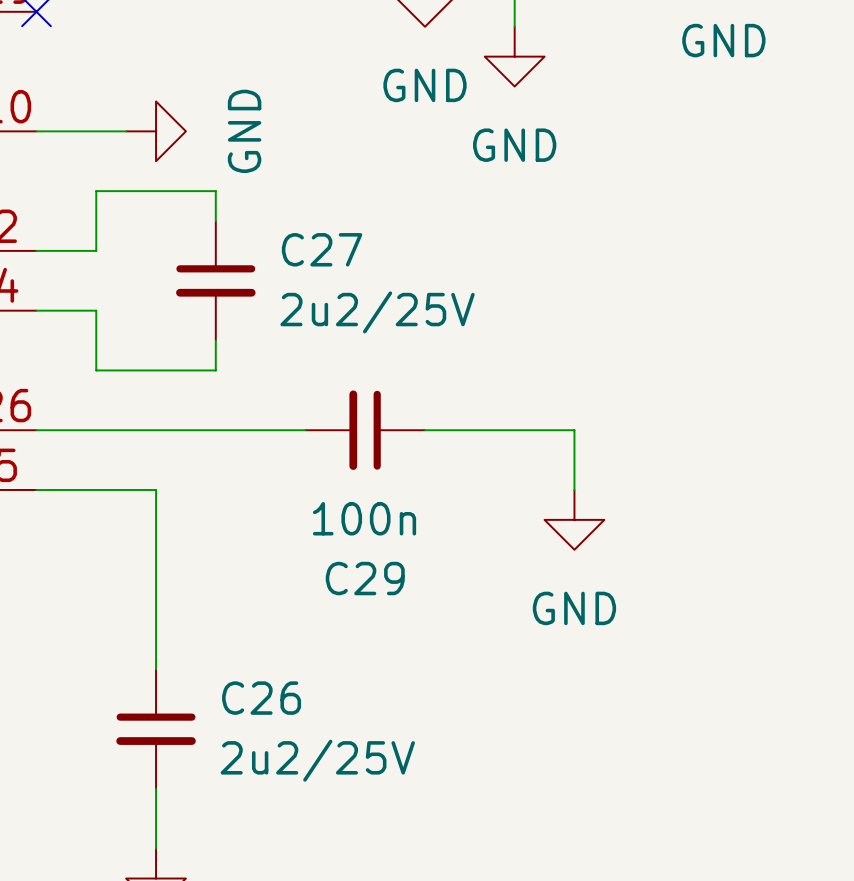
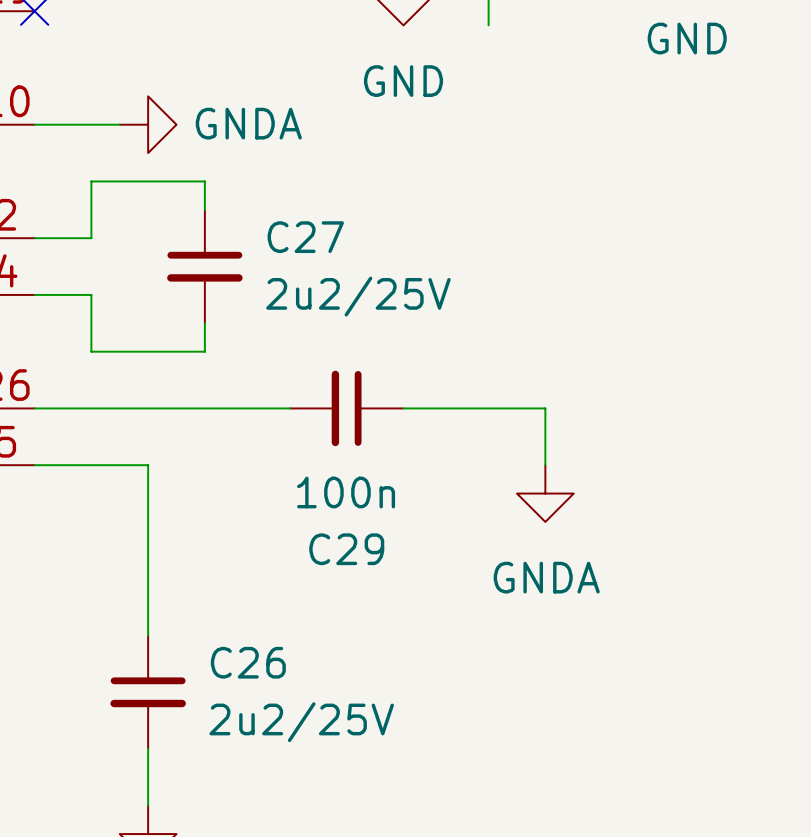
power symbol: GND (514, 56) -> none
power symbol: GND (156, 131) -> GNDA (148, 124)
power symbol: GND (574, 519) -> GNDA (545, 493)

